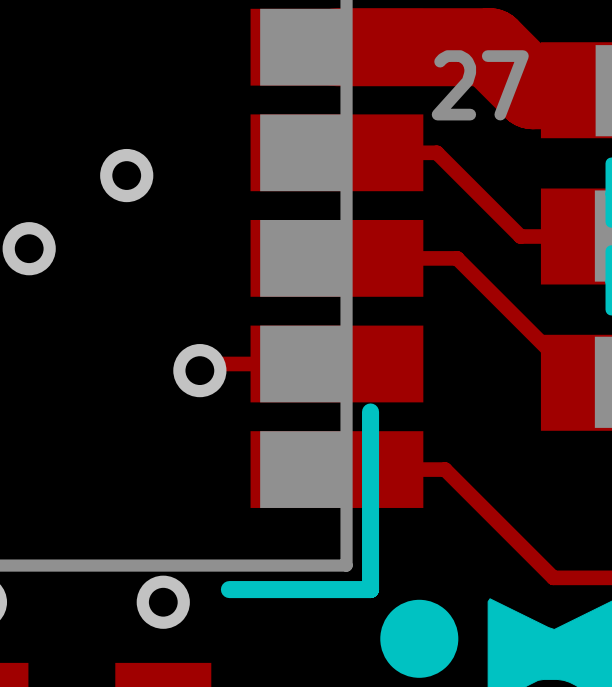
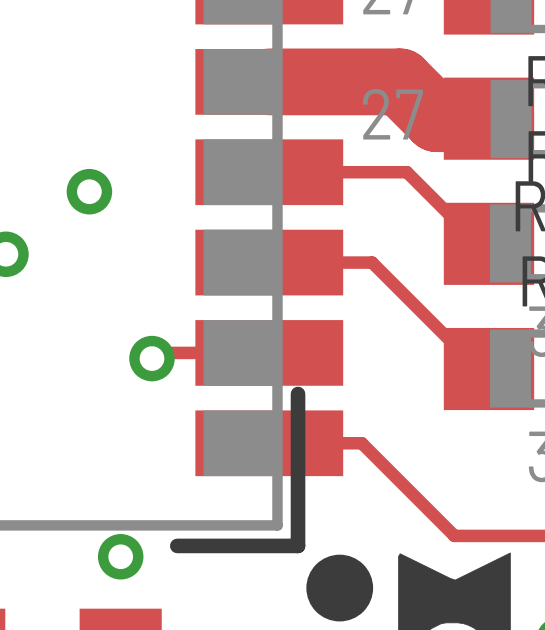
track: (436, 152) (520, 236) (581, 236) -> (354, 172) (406, 172) (478, 243)

